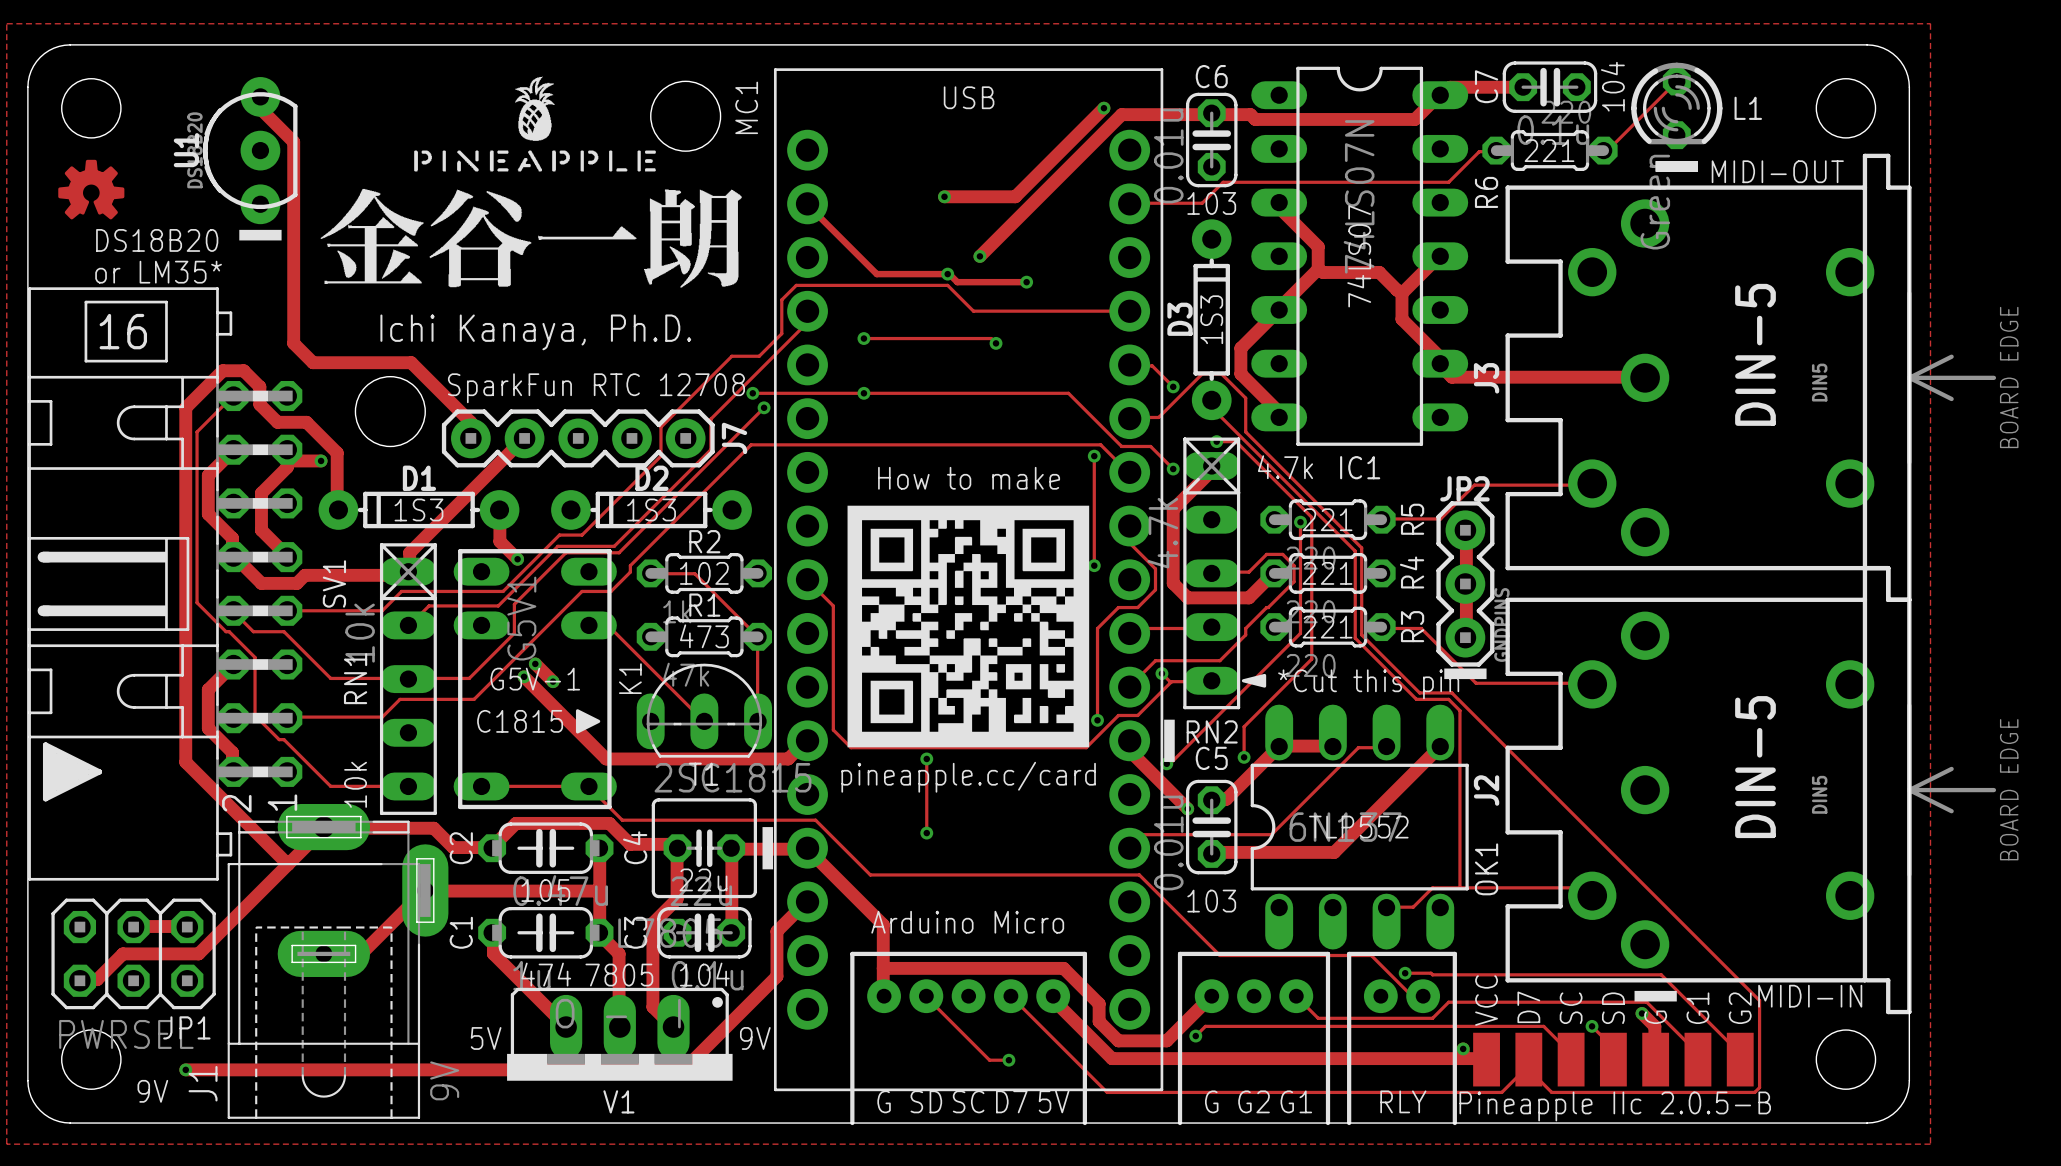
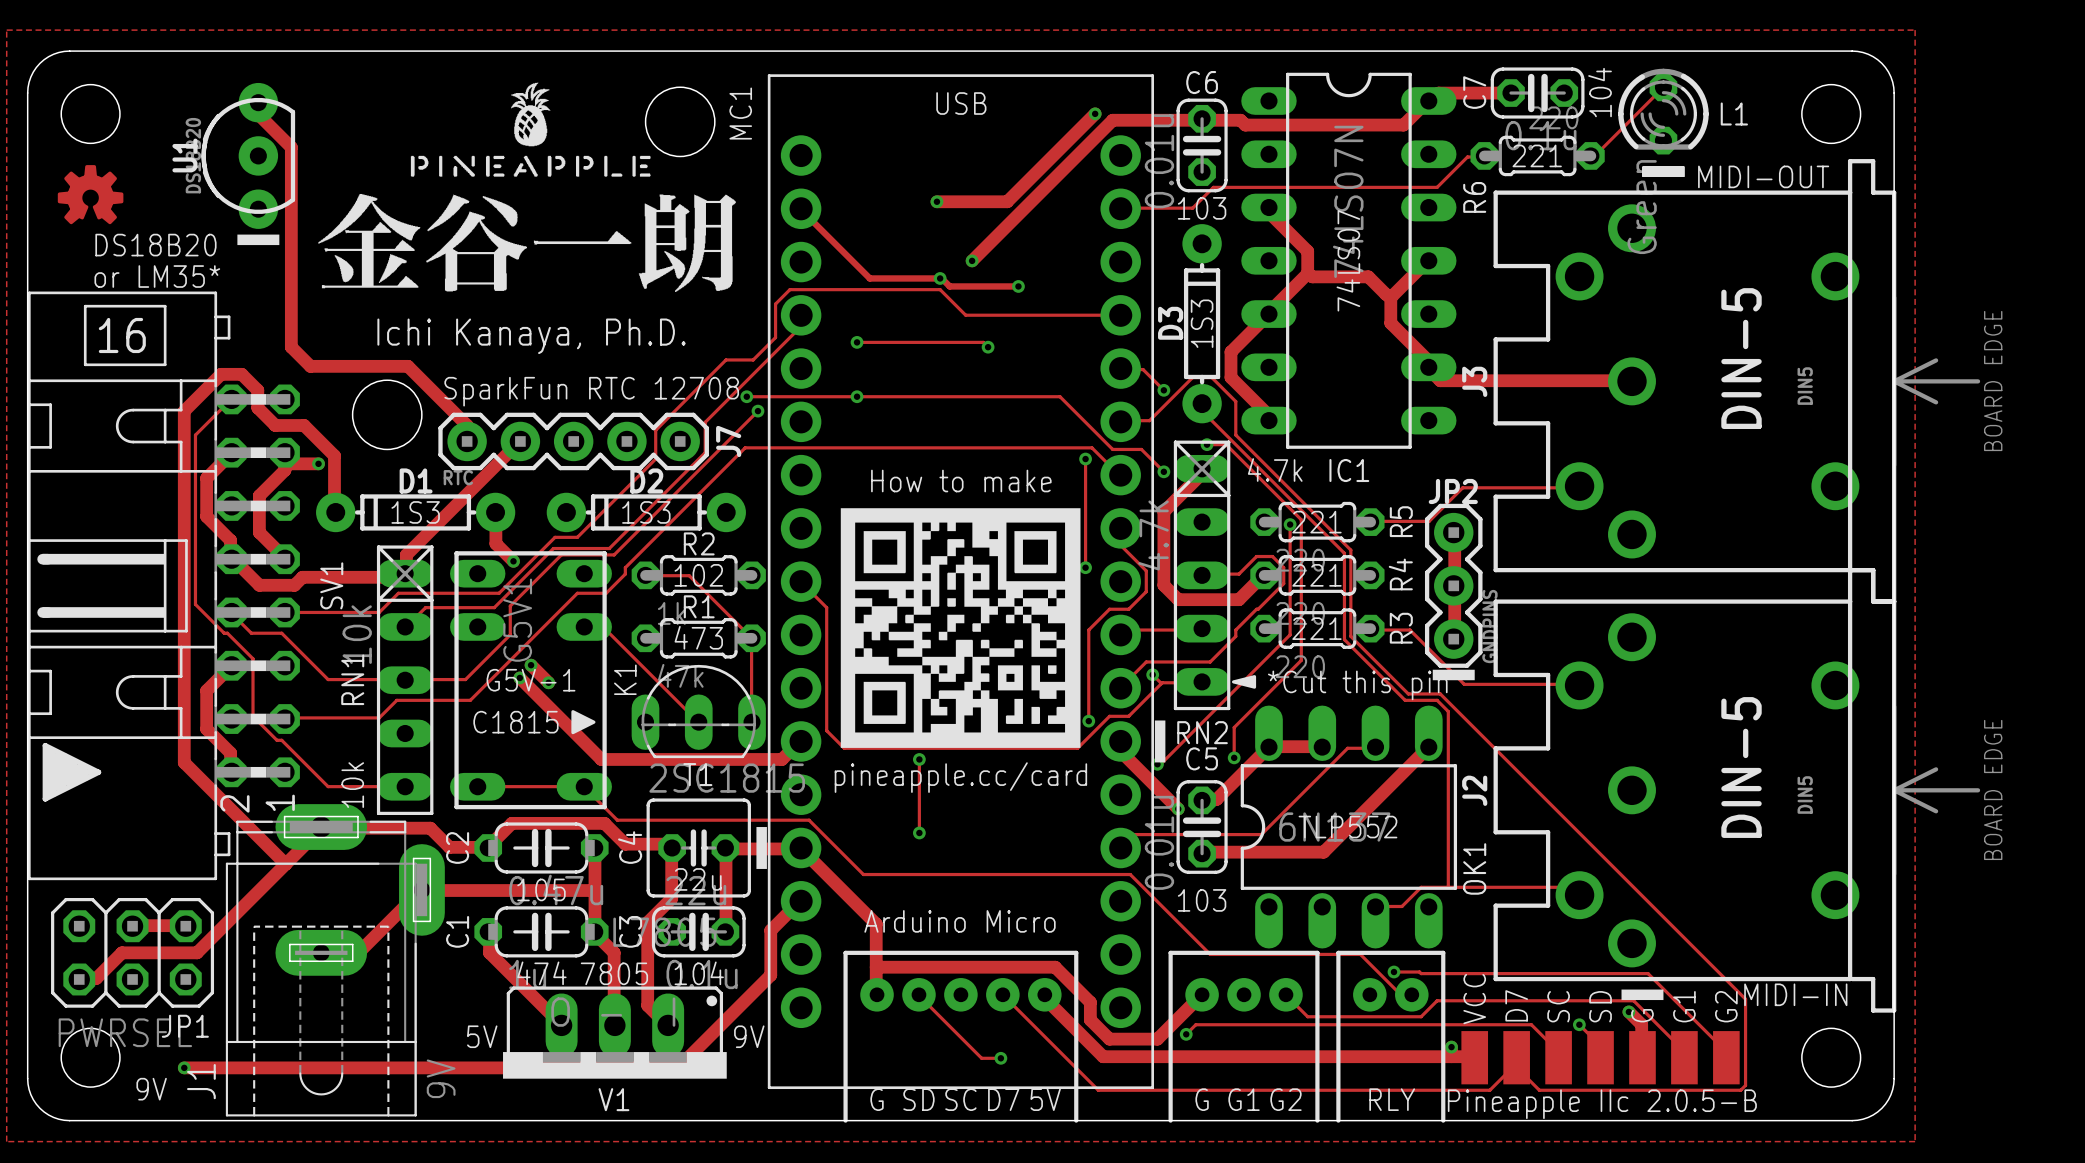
J7 value: none -> RTC (458, 477)
text: G2 (1254, 1101) -> G1 (1244, 1099)
text: G1 (1296, 1101) -> G2 (1285, 1099)

